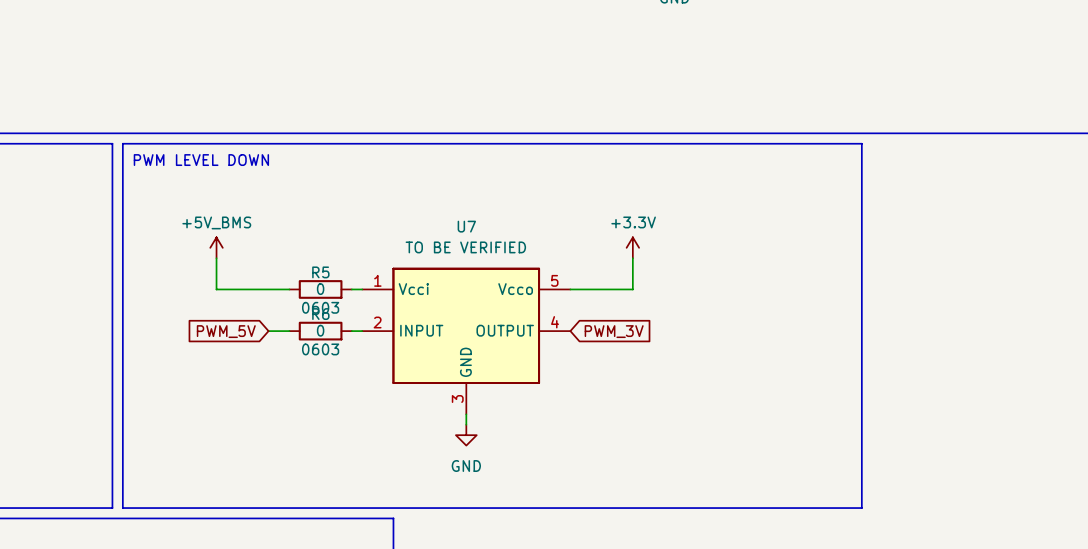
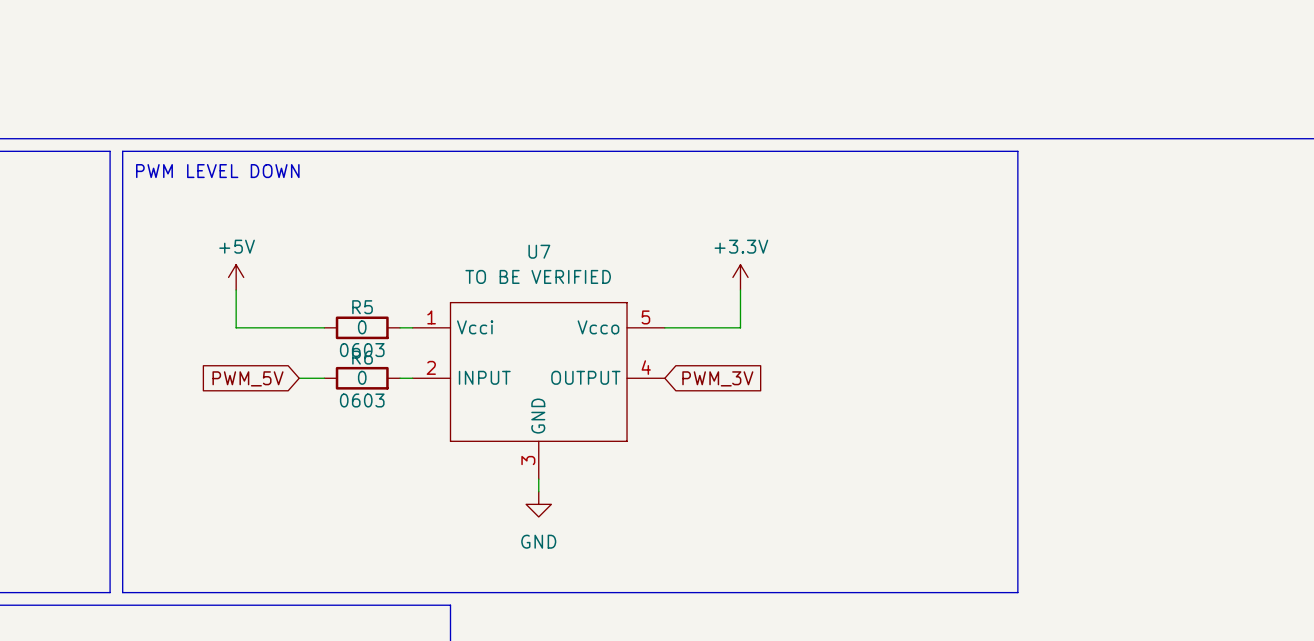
power symbol: +5V_BMS (216, 247) -> +5V (236, 277)
U7 symbol: [362, 268, 571, 415] -> [412, 301, 665, 480]

